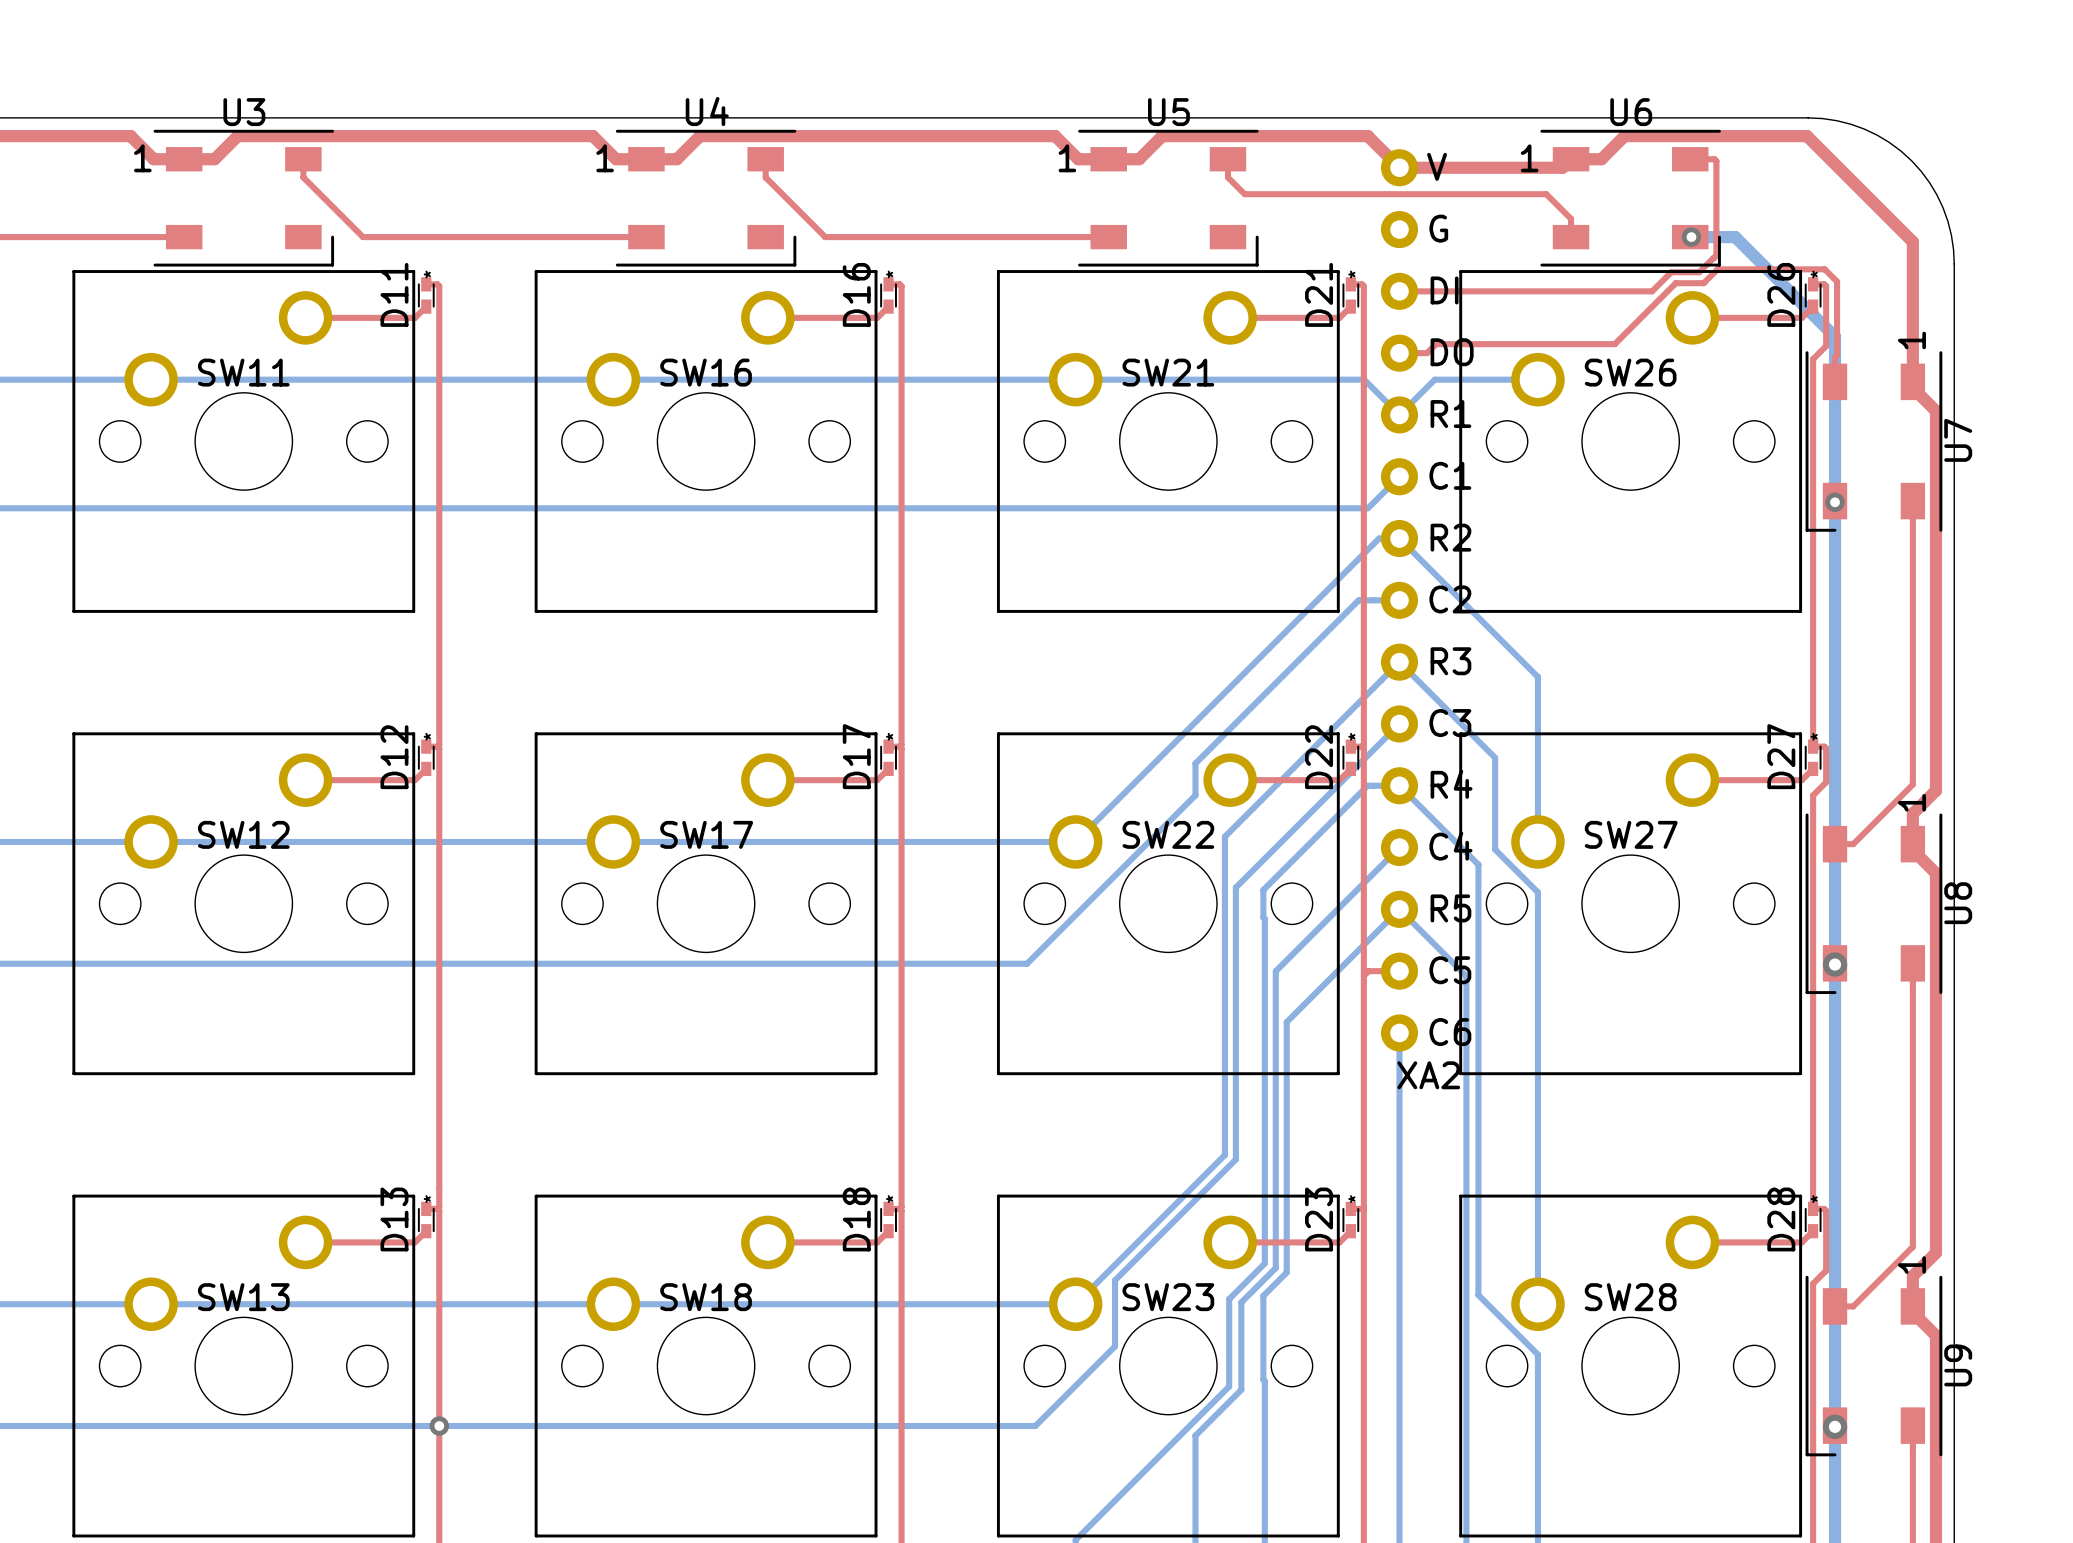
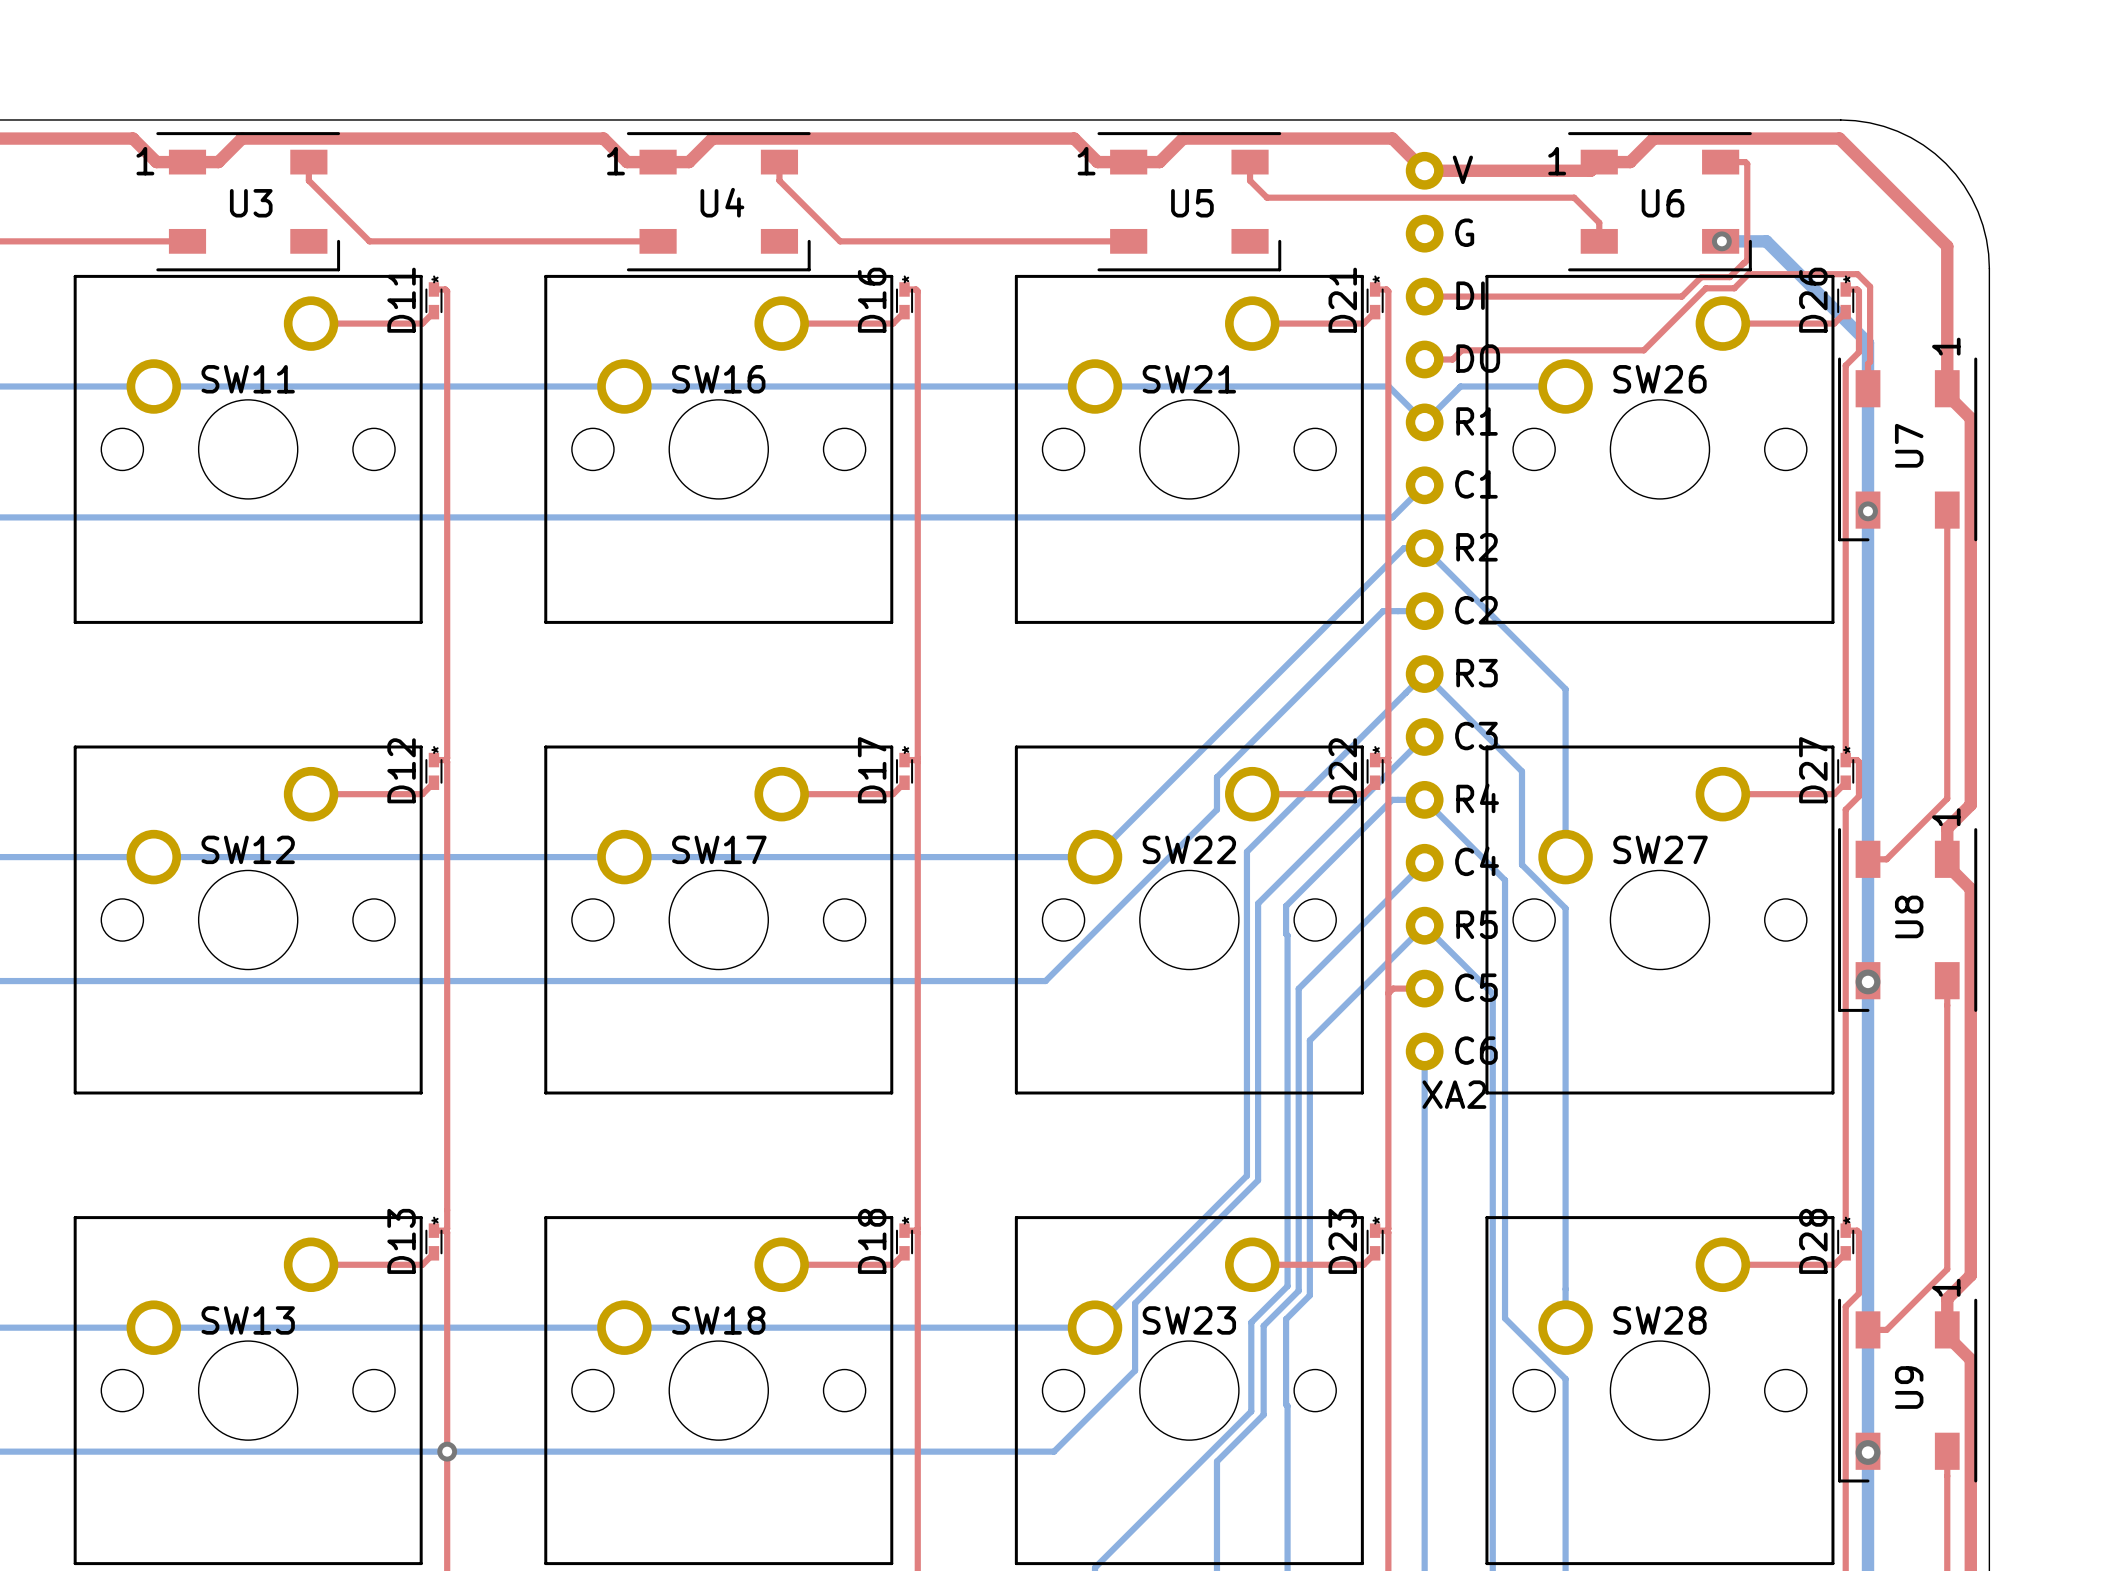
U4 name position: U4 (707, 111) -> U4 (722, 202)
U3 name position: U3 (244, 112) -> U3 (251, 203)
U5 name position: U5 (1168, 112) -> U5 (1192, 203)
U6 name position: U6 (1631, 112) -> U6 (1663, 203)
U7 name position: U7 (1958, 440) -> U7 (1909, 445)
U8 name position: U8 (1958, 903) -> U8 (1909, 916)
U9 name position: U9 (1958, 1365) -> U9 (1909, 1387)

